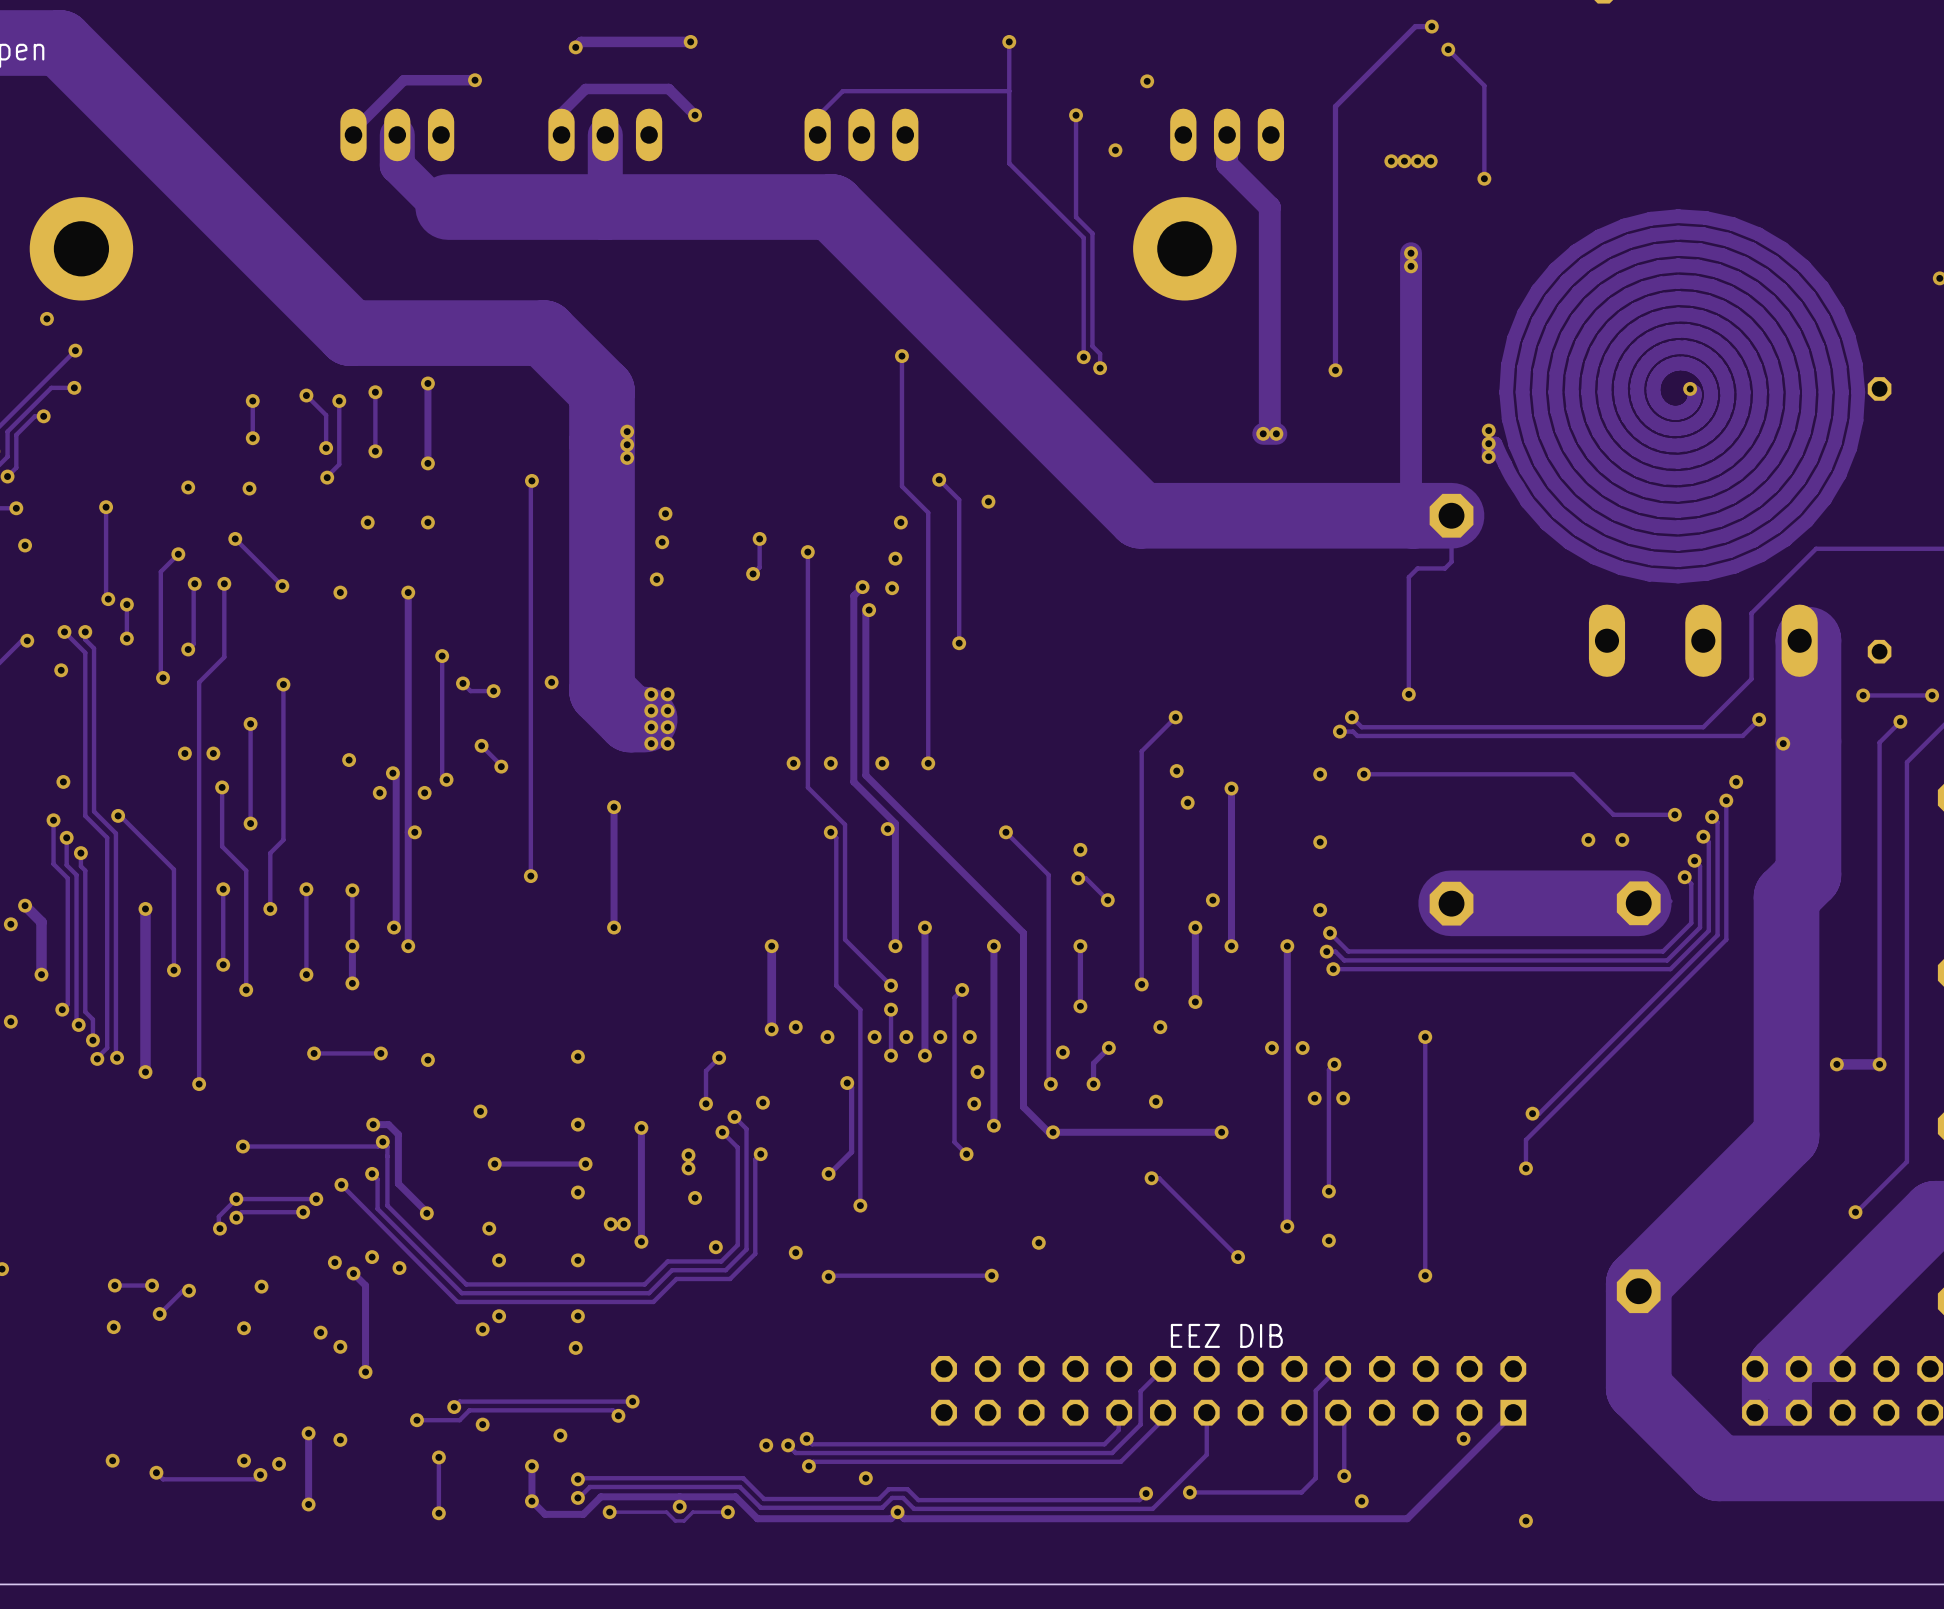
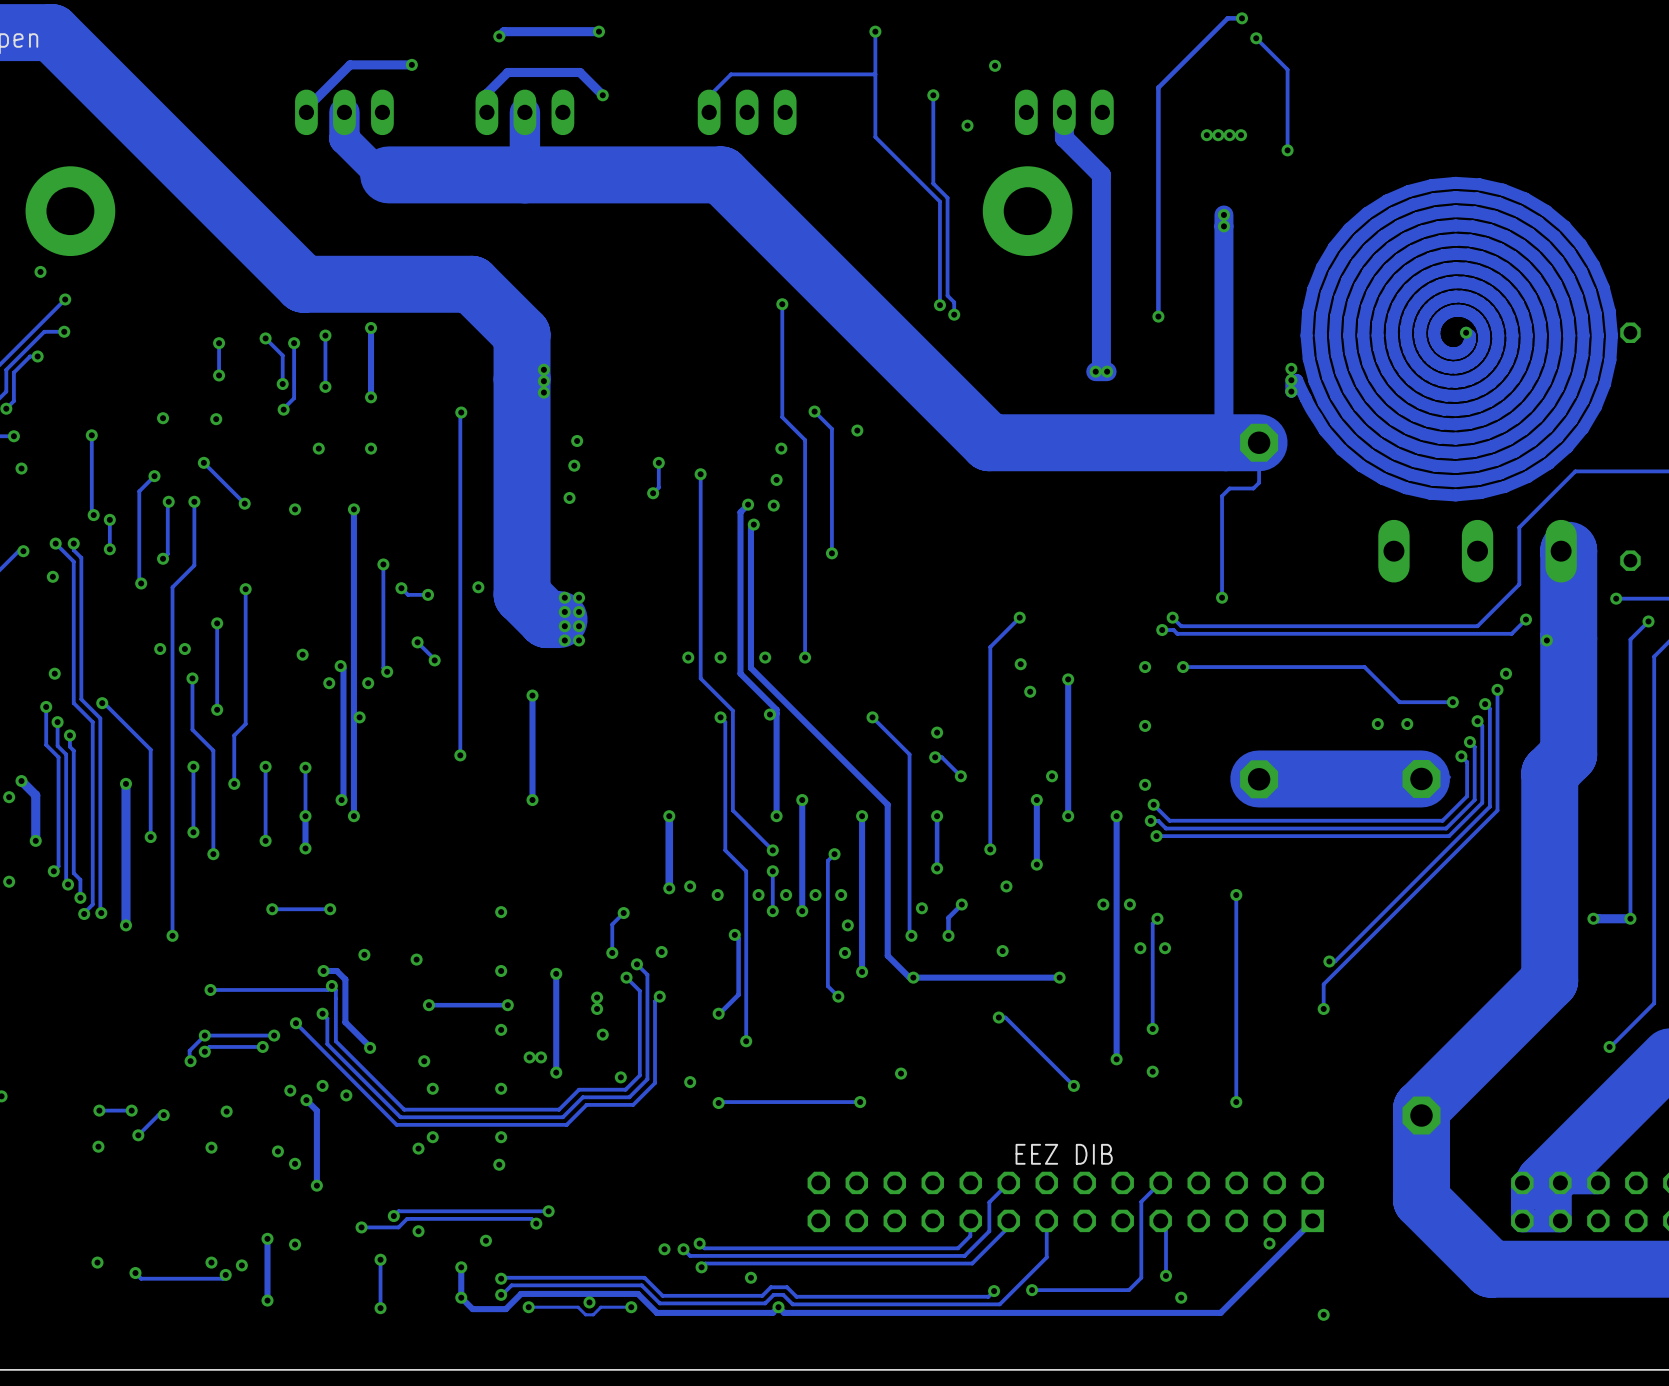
via position: (427, 1060) -> (364, 954)

